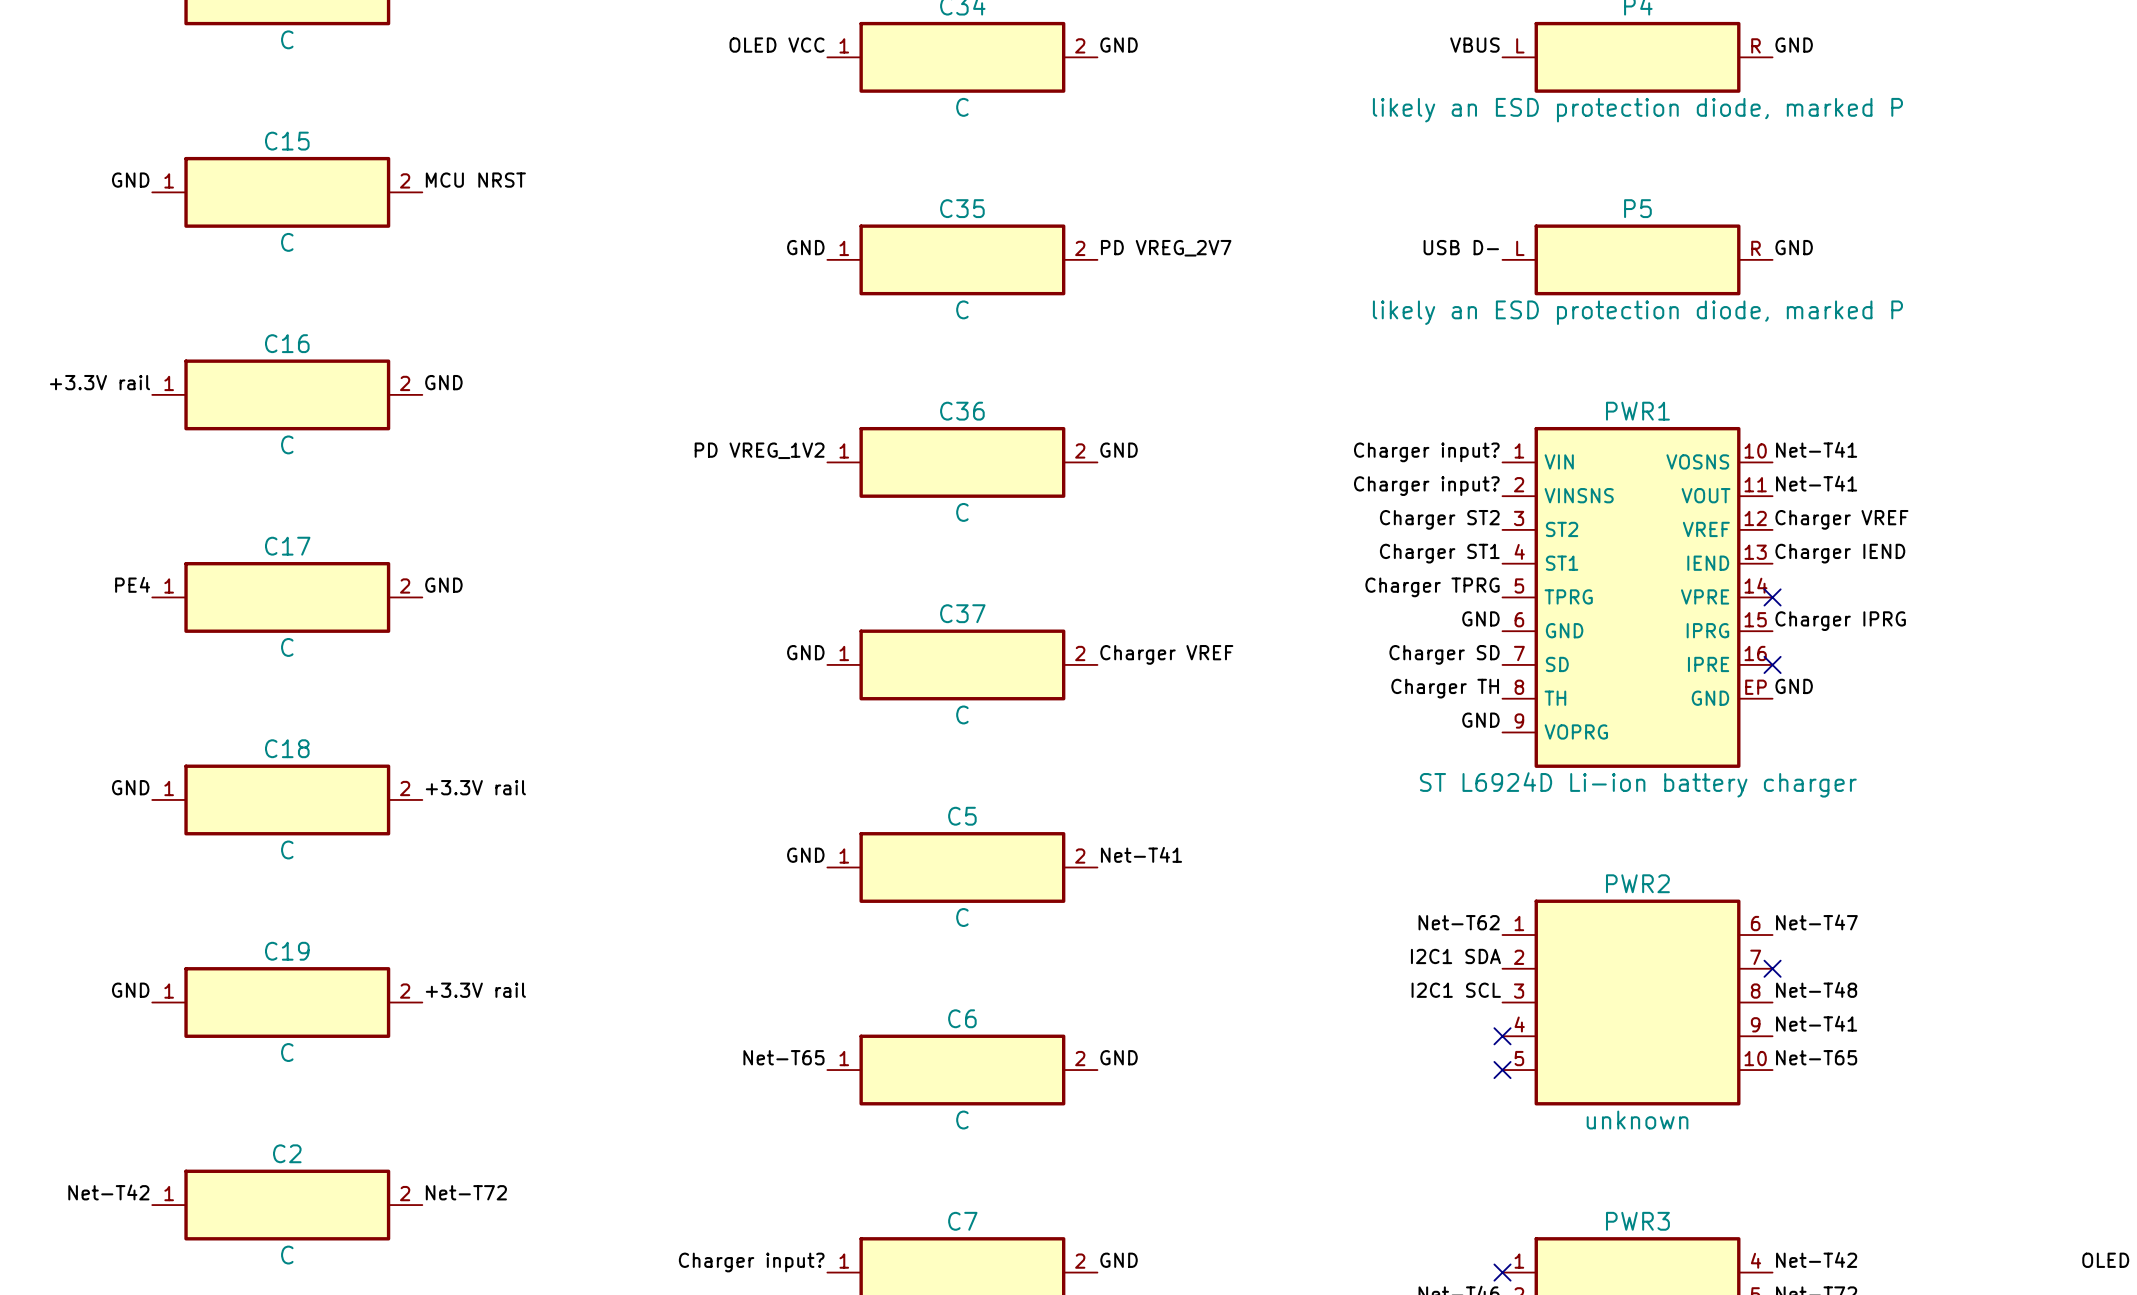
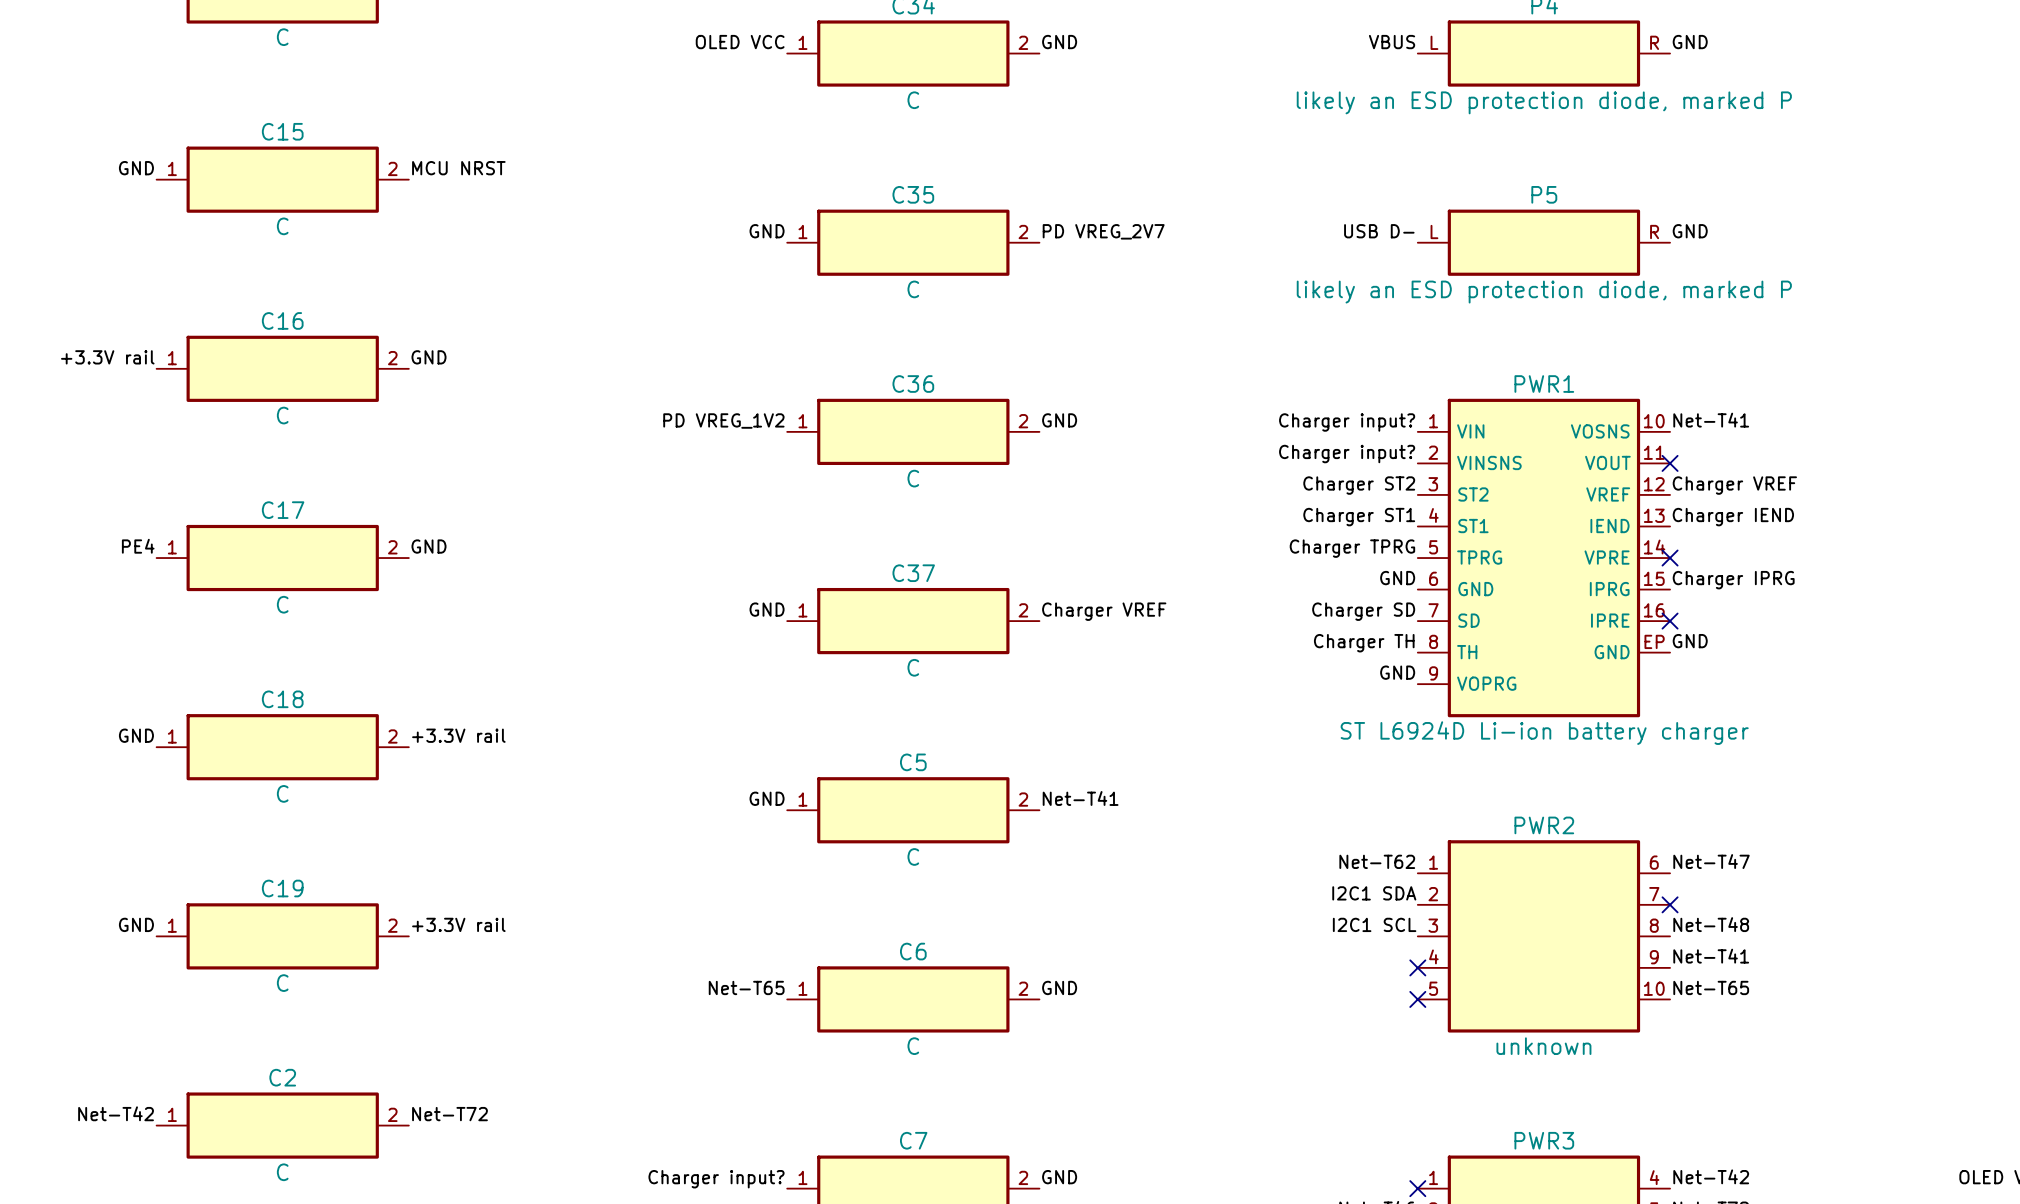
label: Net-T41 (1816, 483) -> none
no-connect mark: none -> (1670, 463)

